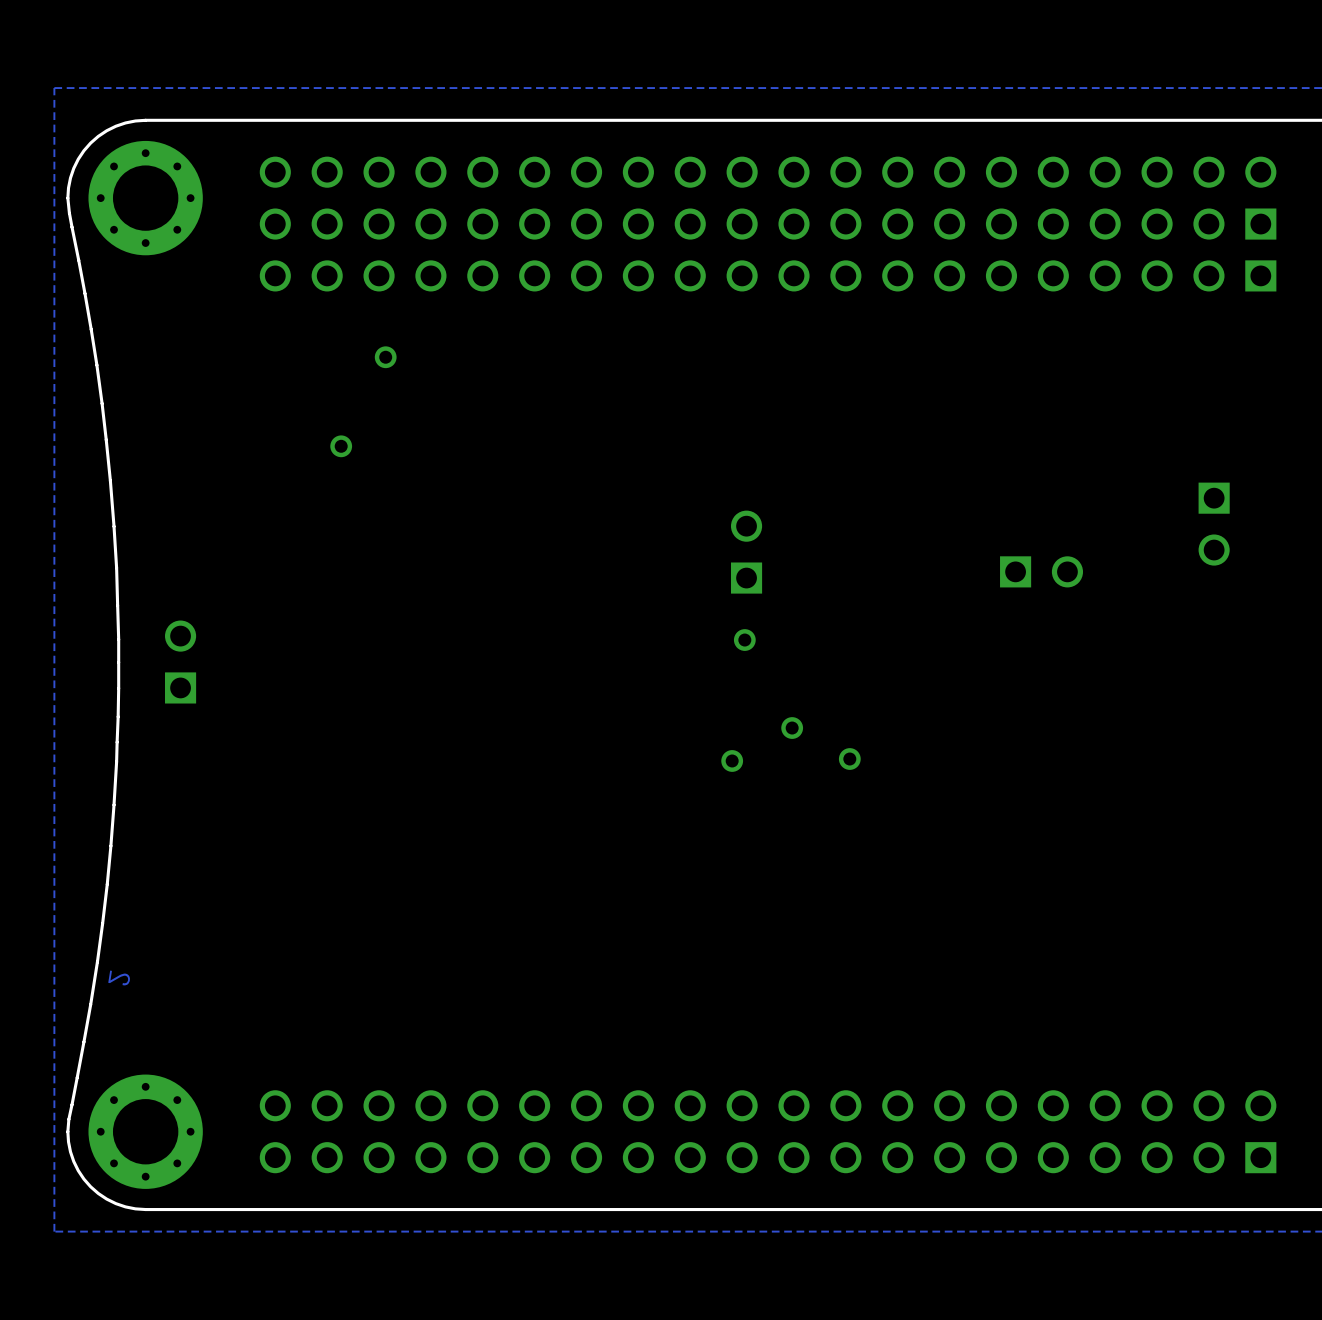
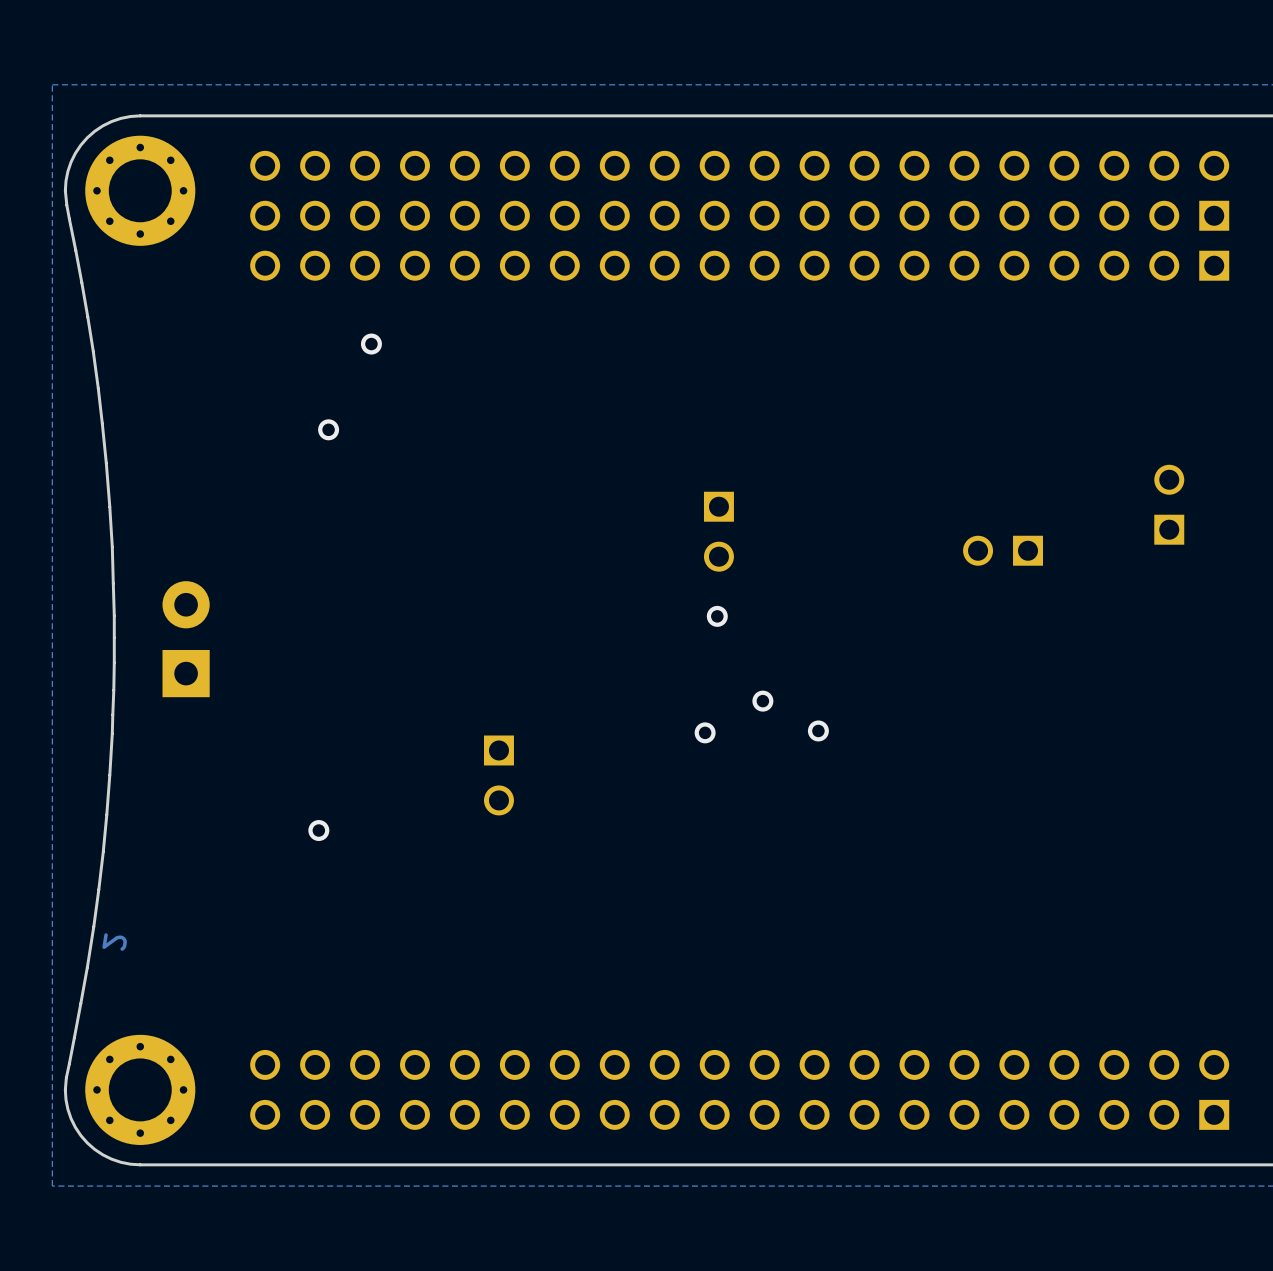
part rotation: 0° (1214, 524) -> 180° (1169, 504)
part rotation: 0° (746, 552) -> 180° (718, 531)
part rotation: 0° (1041, 571) -> 180° (1003, 550)
part footprint: [165, 620, 197, 704] -> [162, 581, 210, 698]
part: none -> (498, 775)
via: none -> (318, 830)

